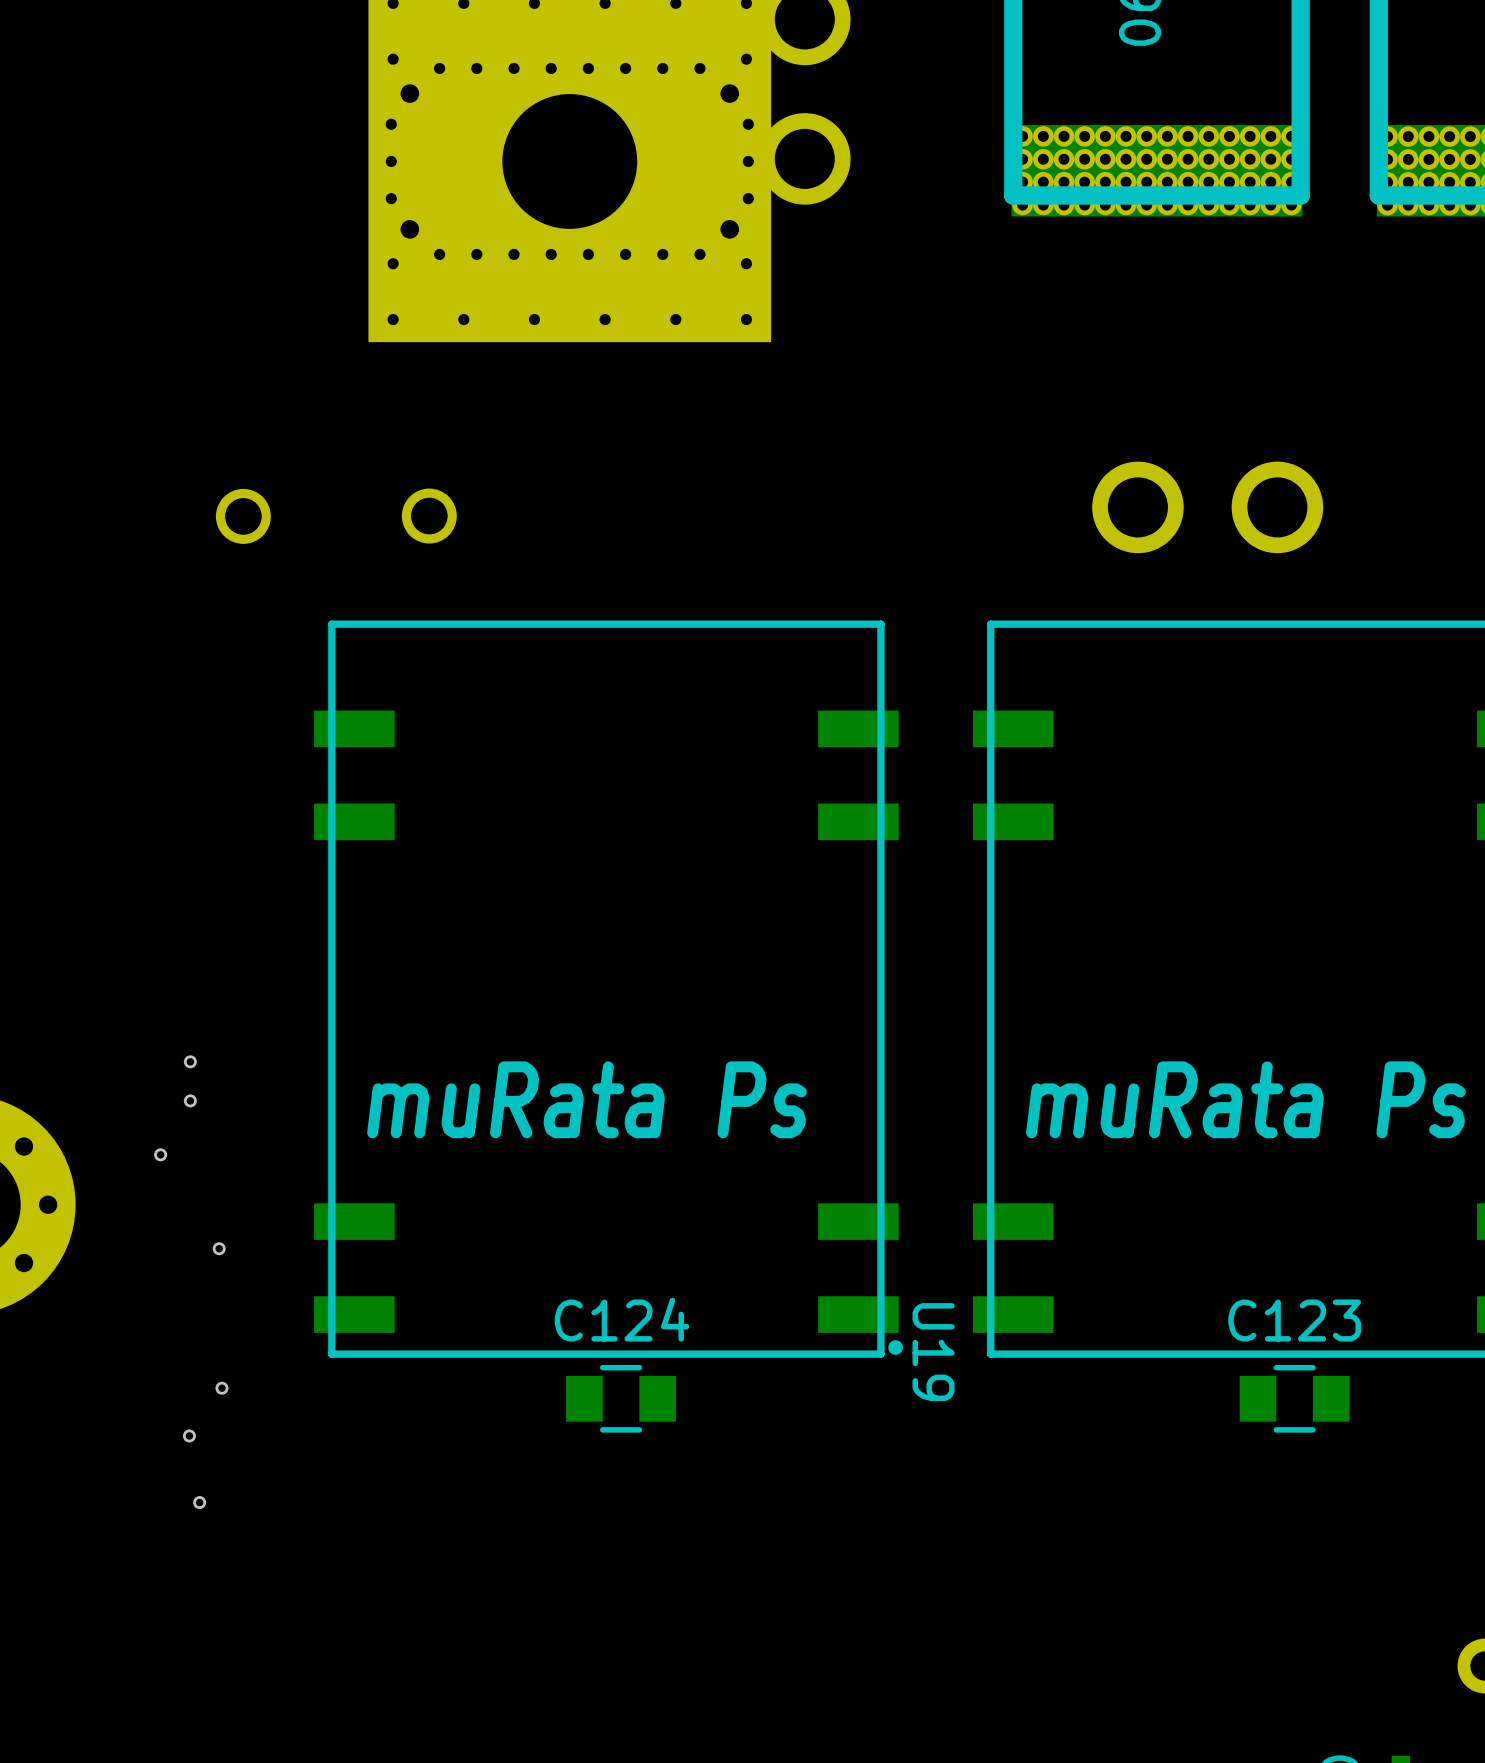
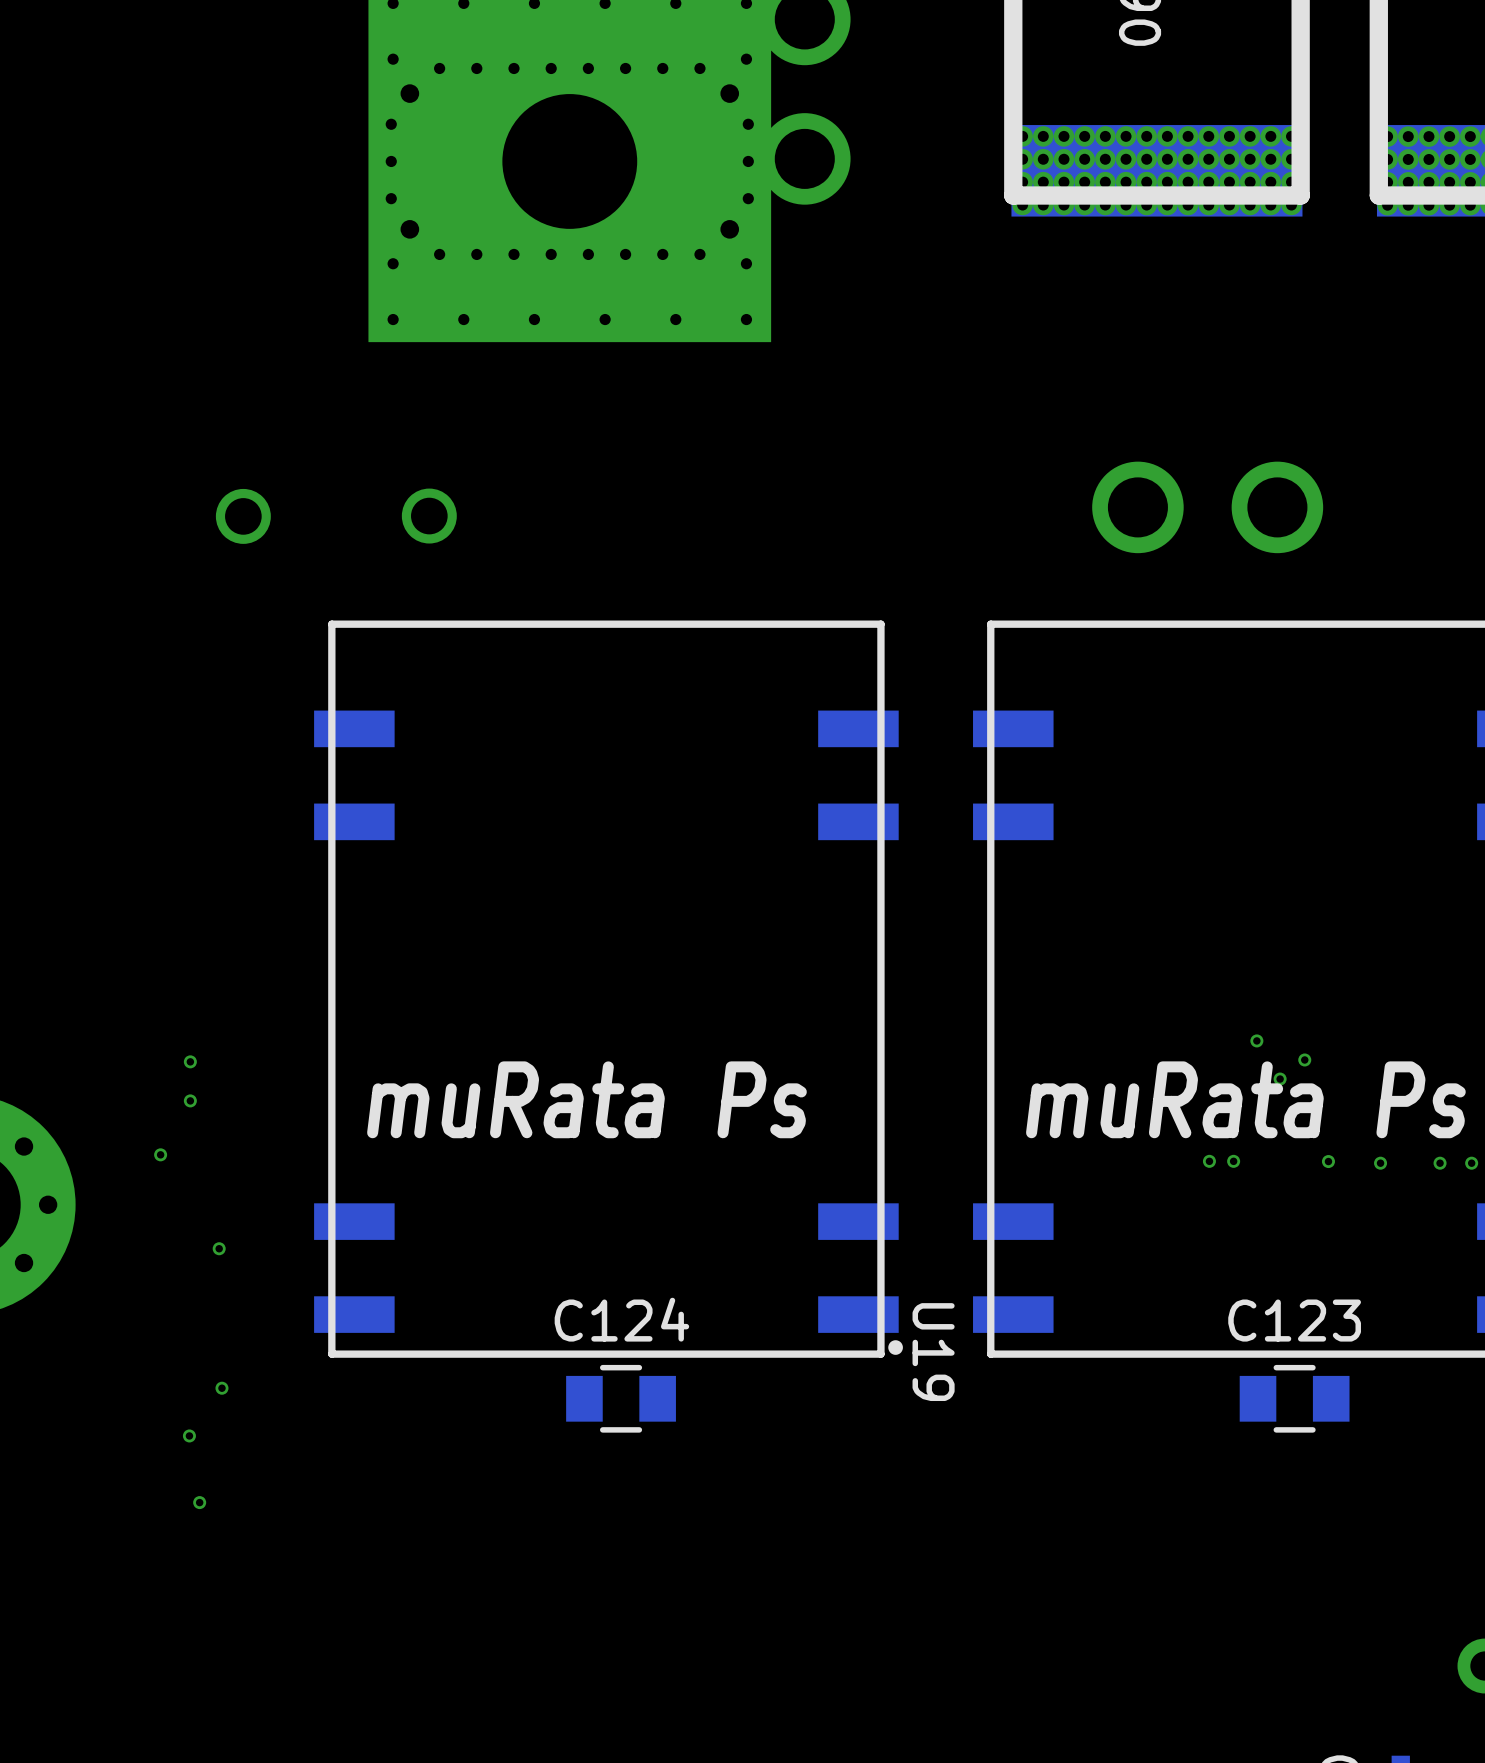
via: none -> (1256, 1040)
via: none -> (1304, 1059)
via: none -> (1280, 1079)
via: none -> (1209, 1161)
via: none -> (1233, 1161)
via: none -> (1328, 1161)
via: none -> (1380, 1163)
via: none -> (1440, 1163)
via: none -> (1471, 1163)

